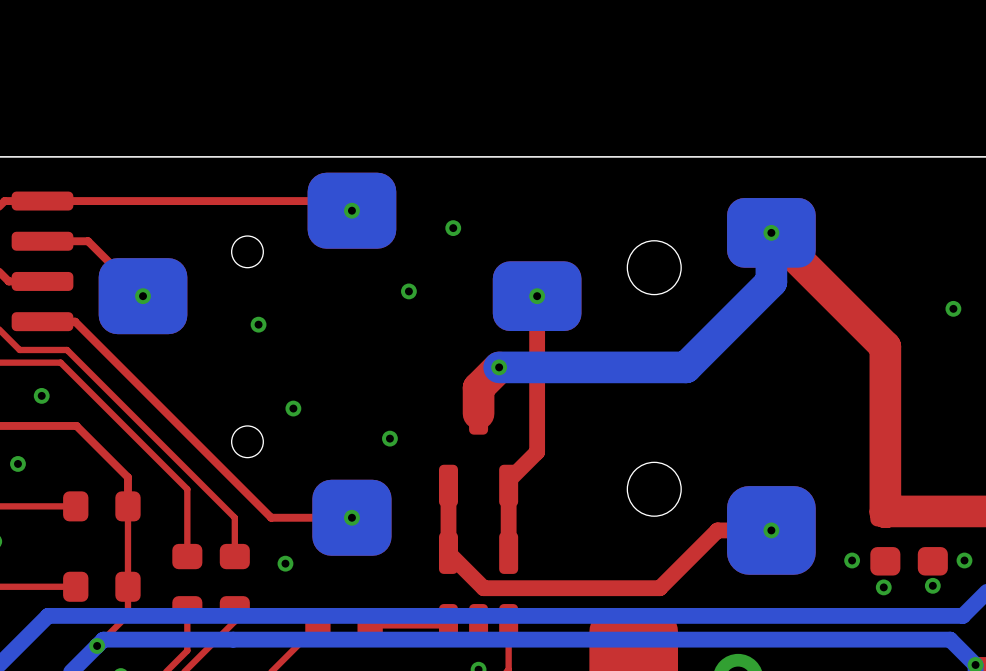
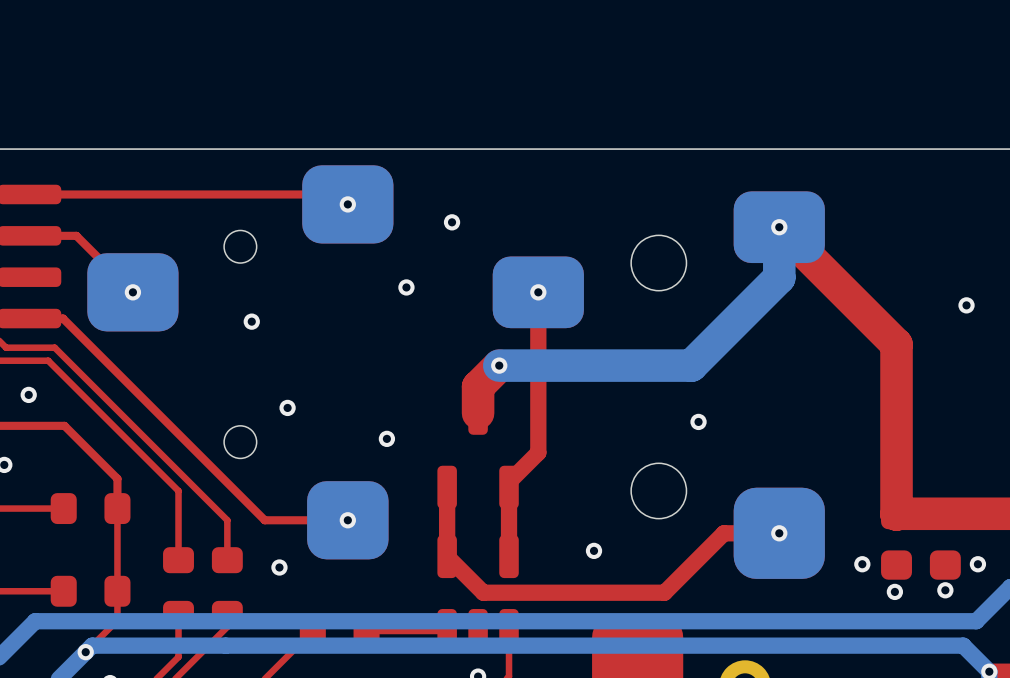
via: none -> (698, 421)
via: none -> (594, 550)

